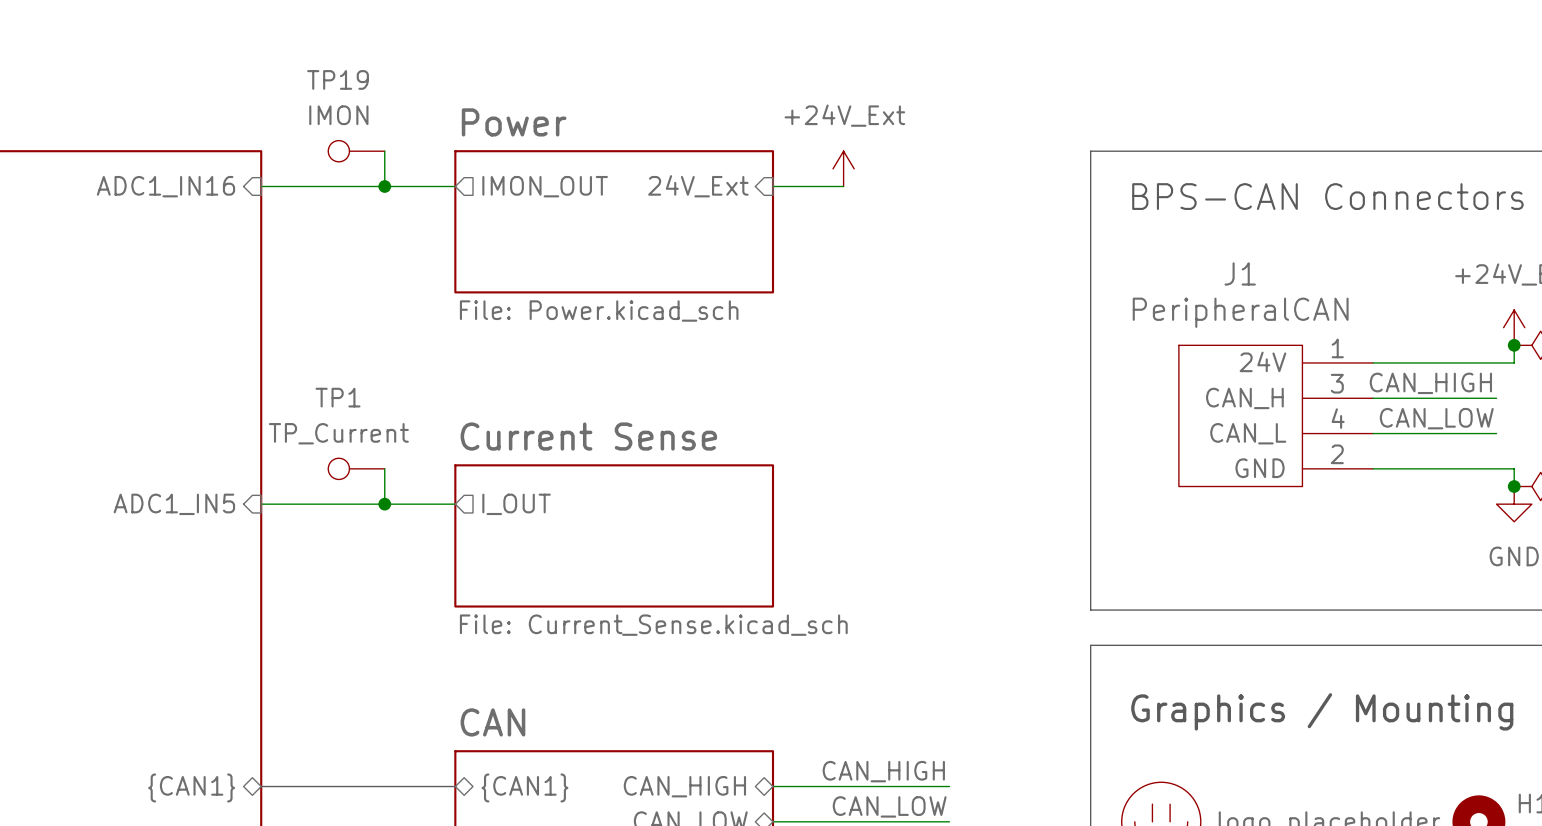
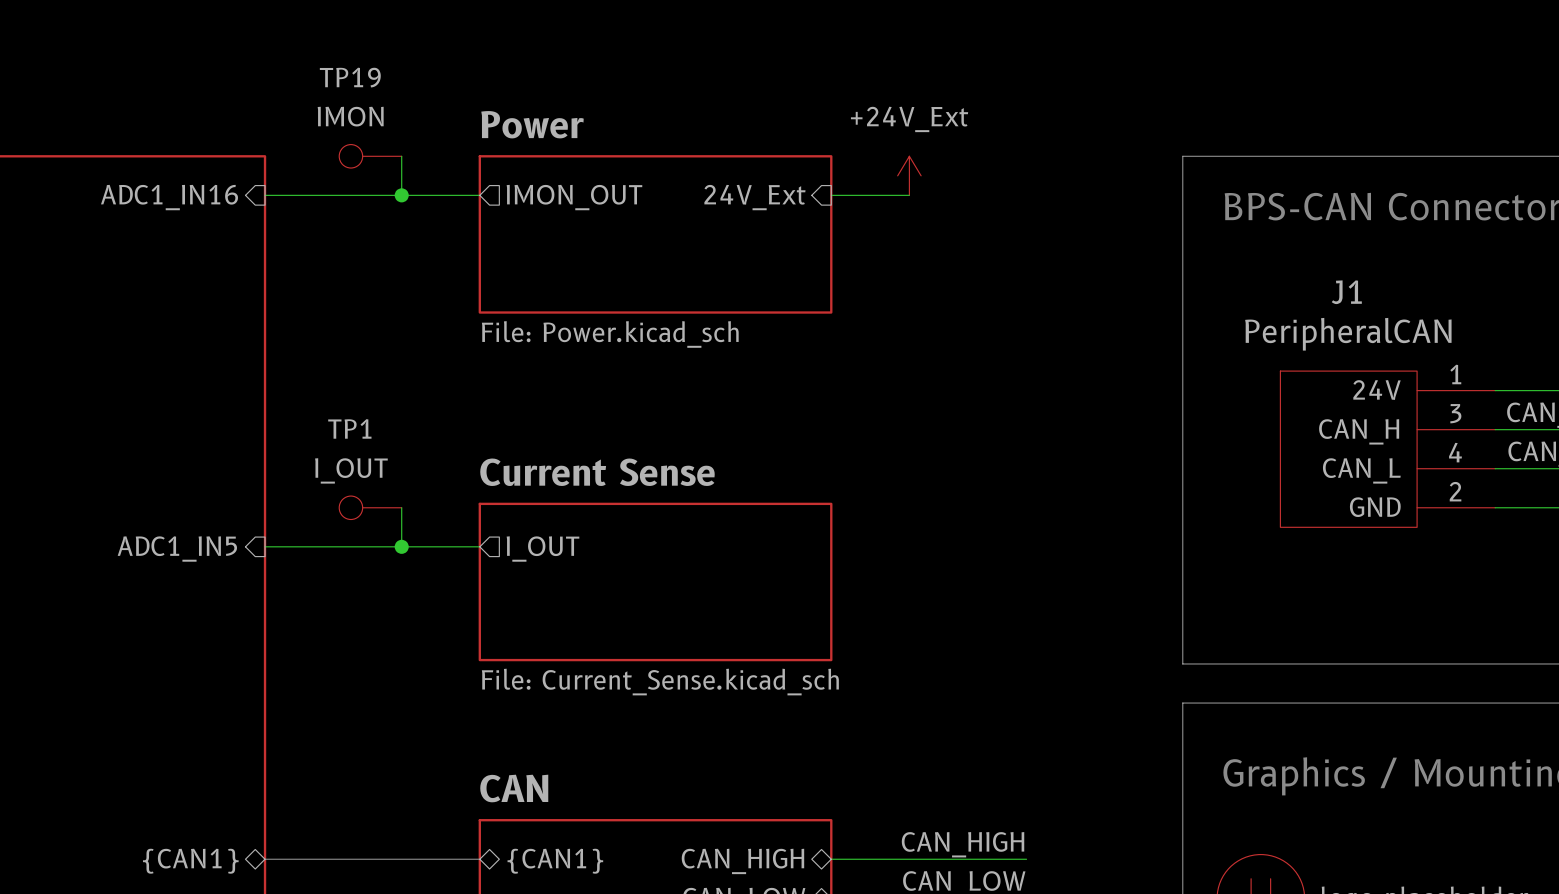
TP1 value: TP_Current (338, 433) -> I_OUT (351, 470)

